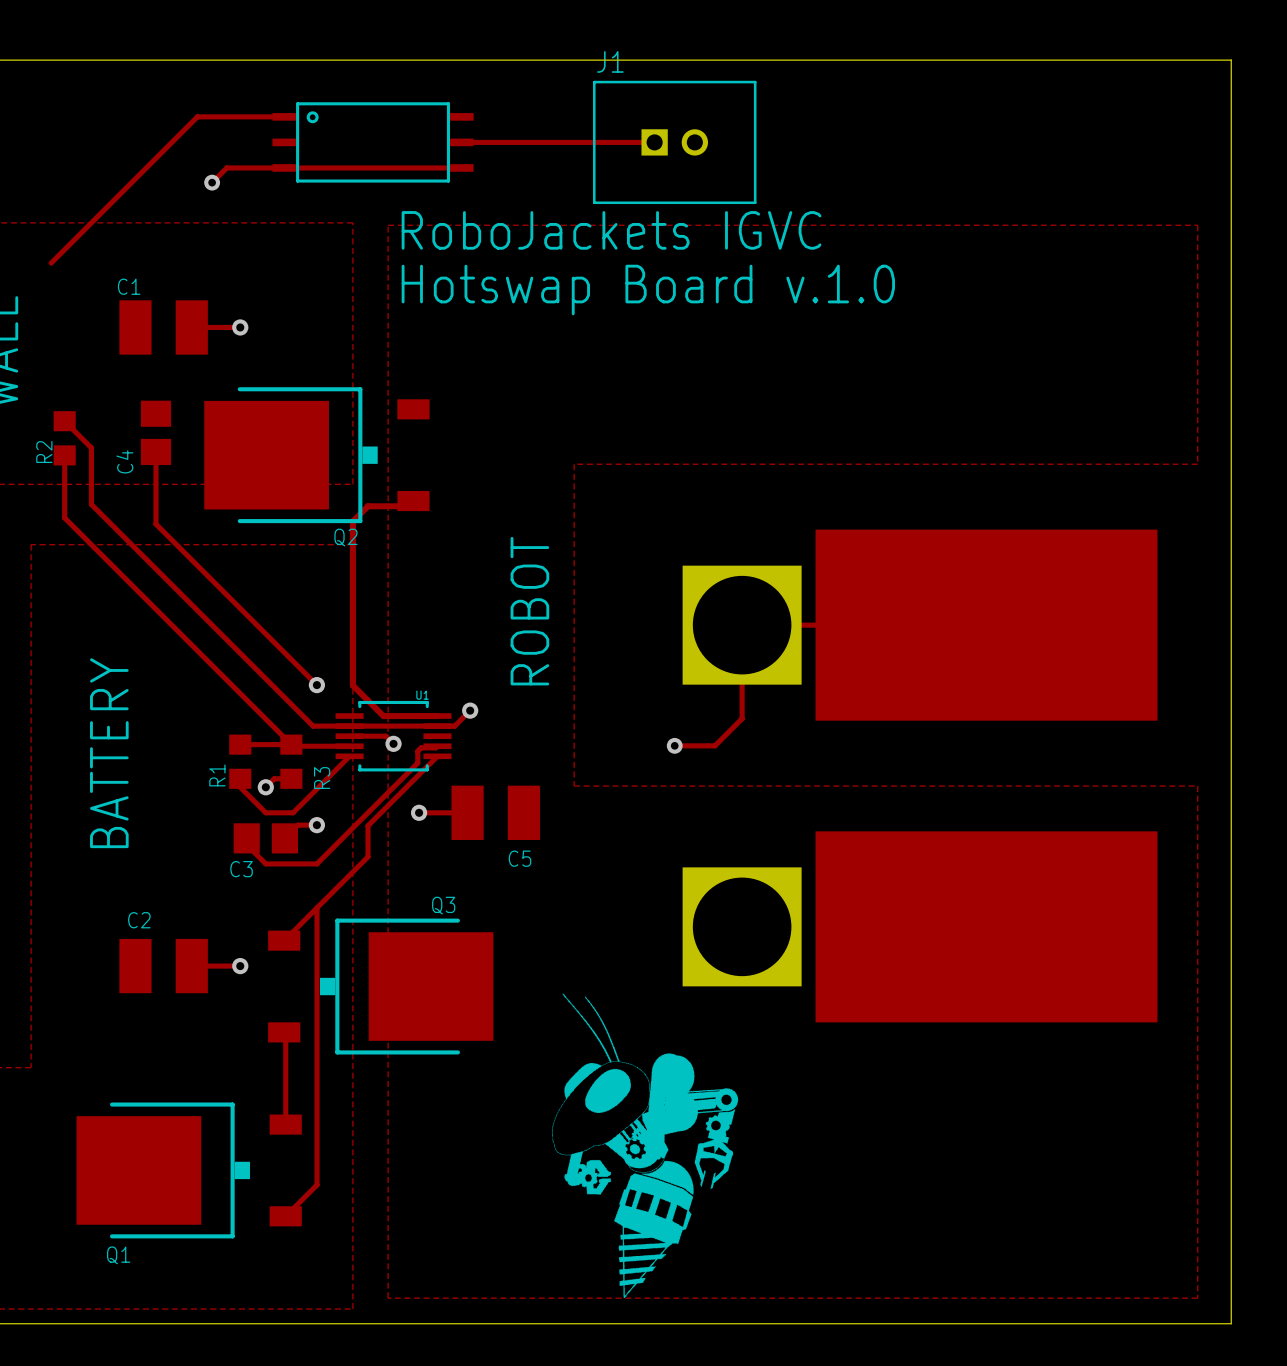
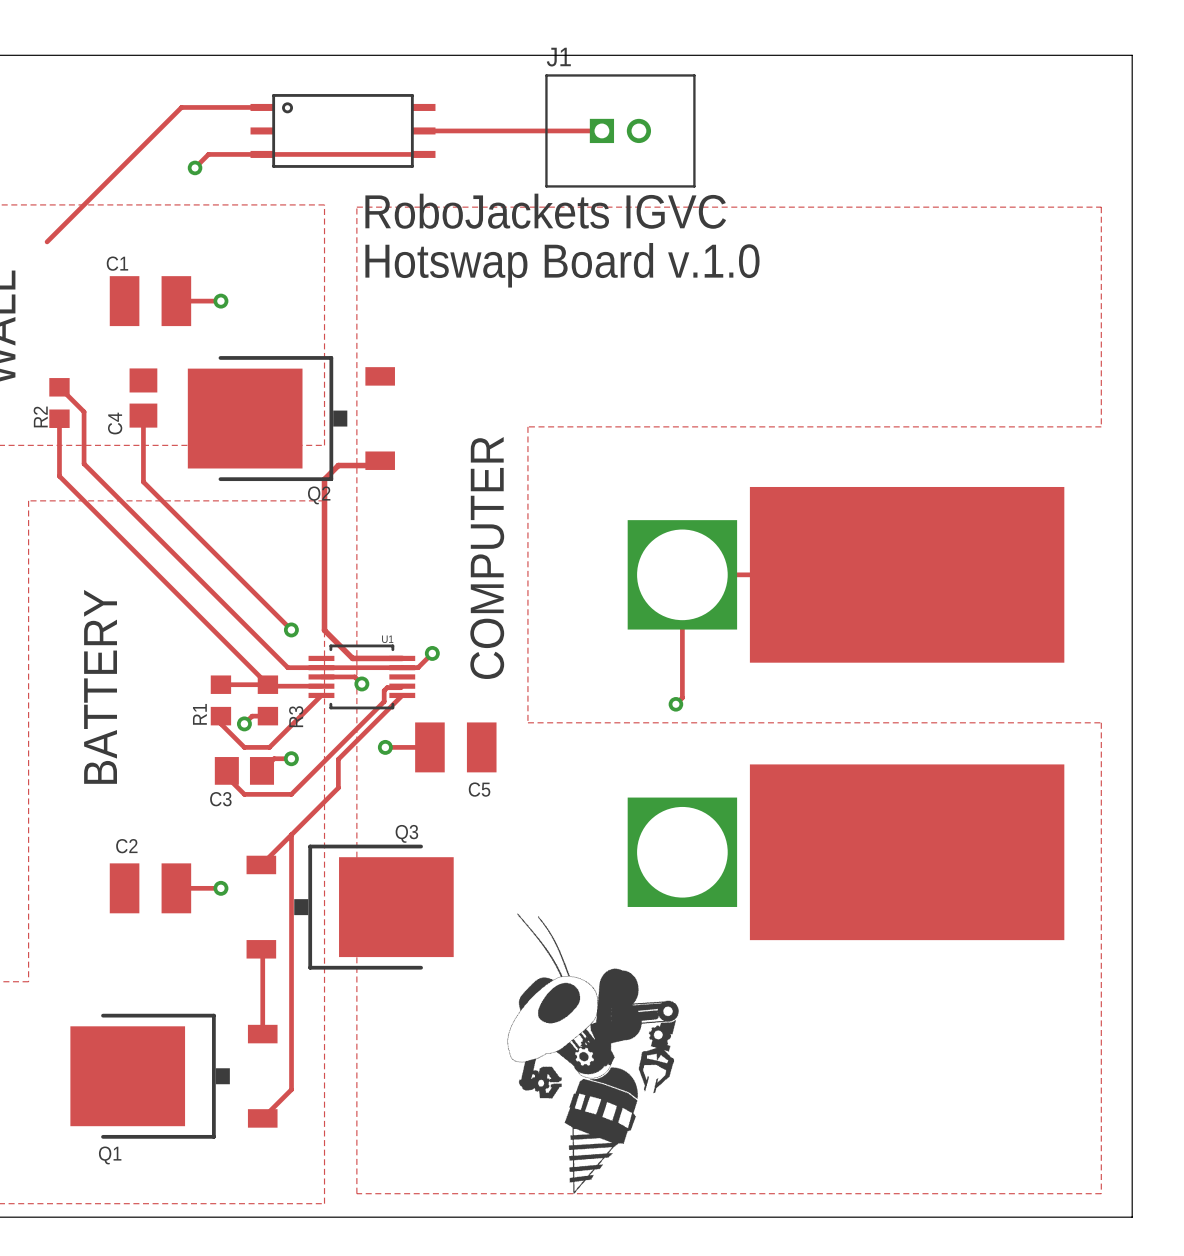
text: none -> COMPUTER (487, 558)
text: ROBOT (529, 611) -> none
track: (742, 718) (714, 745) (674, 745) -> (682, 660) (682, 697) (675, 704)
via position: (674, 745) -> (675, 704)

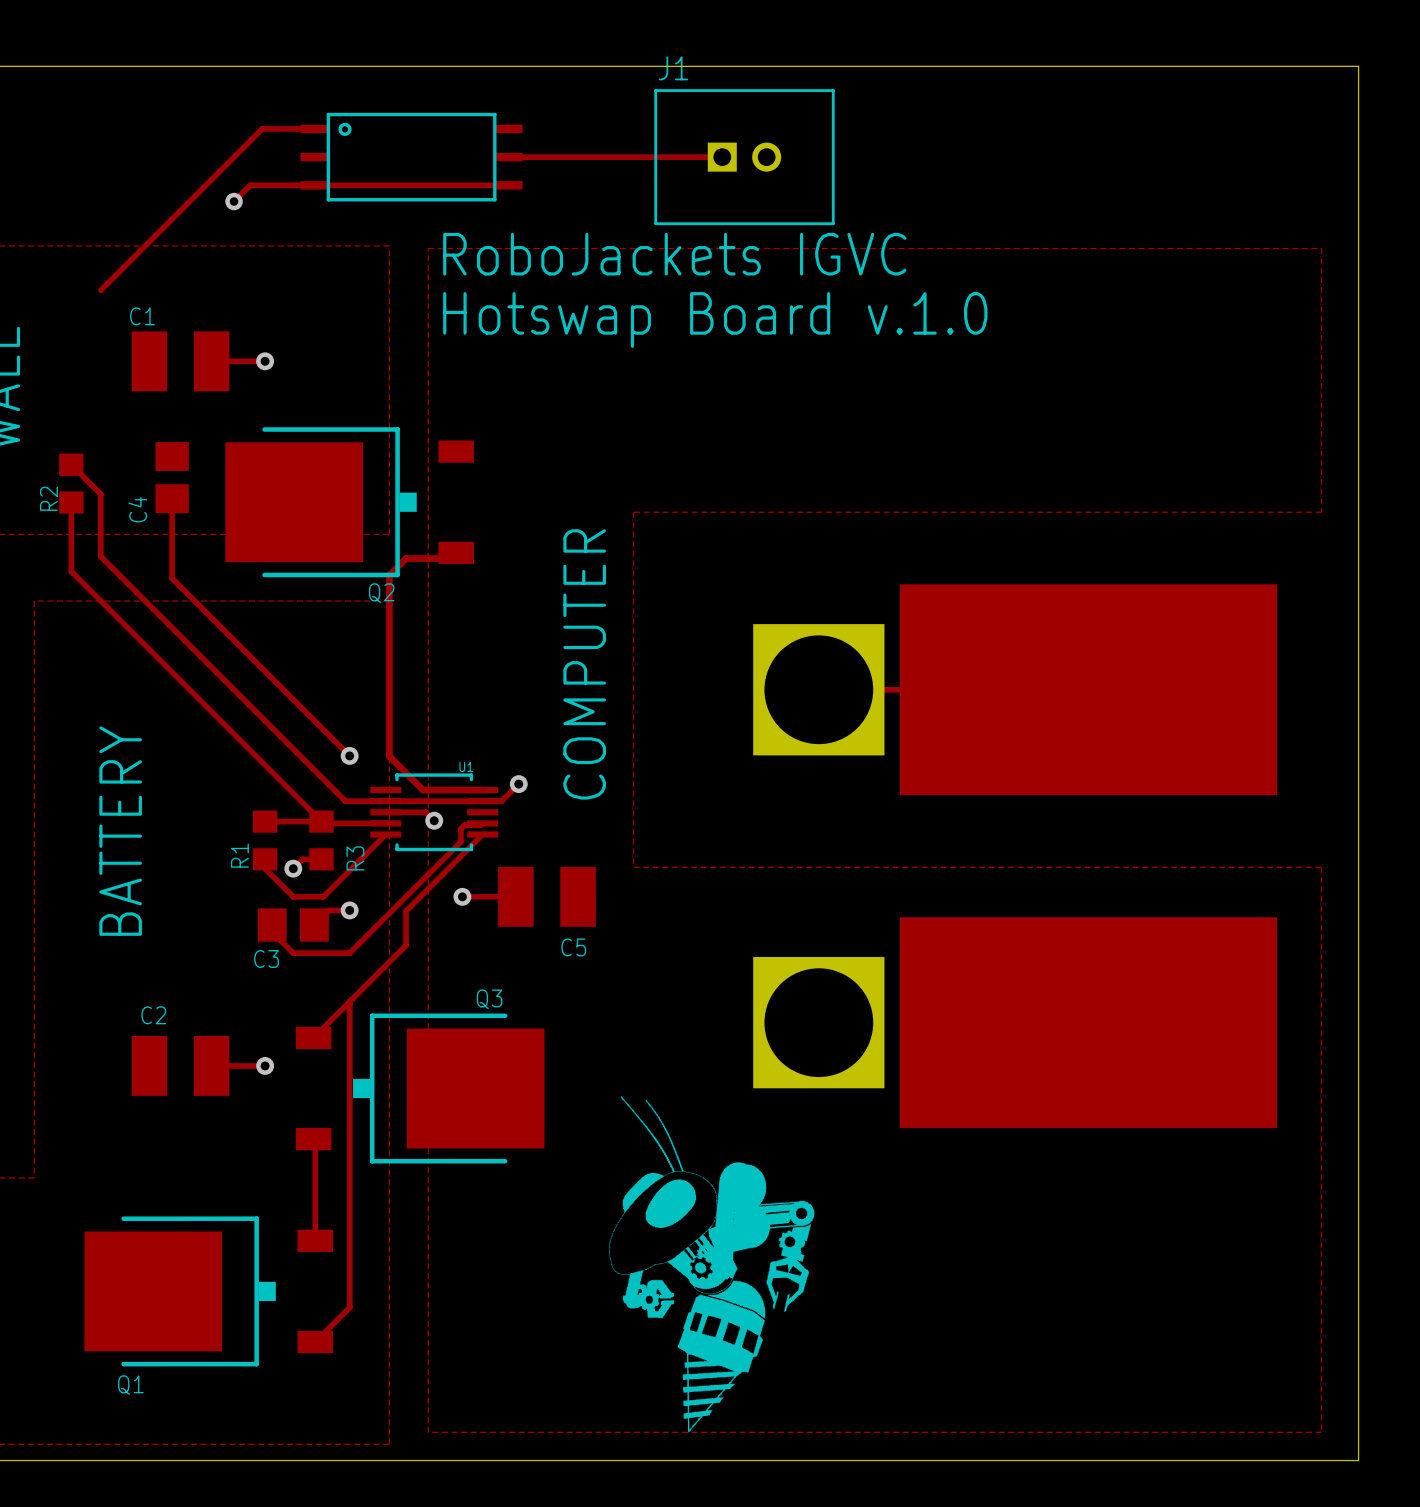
track: (218, 107) (181, 107) (47, 241) -> (262, 128) (100, 290)
track: (682, 574) (682, 697) (675, 704) -> none
via: (675, 704) -> none

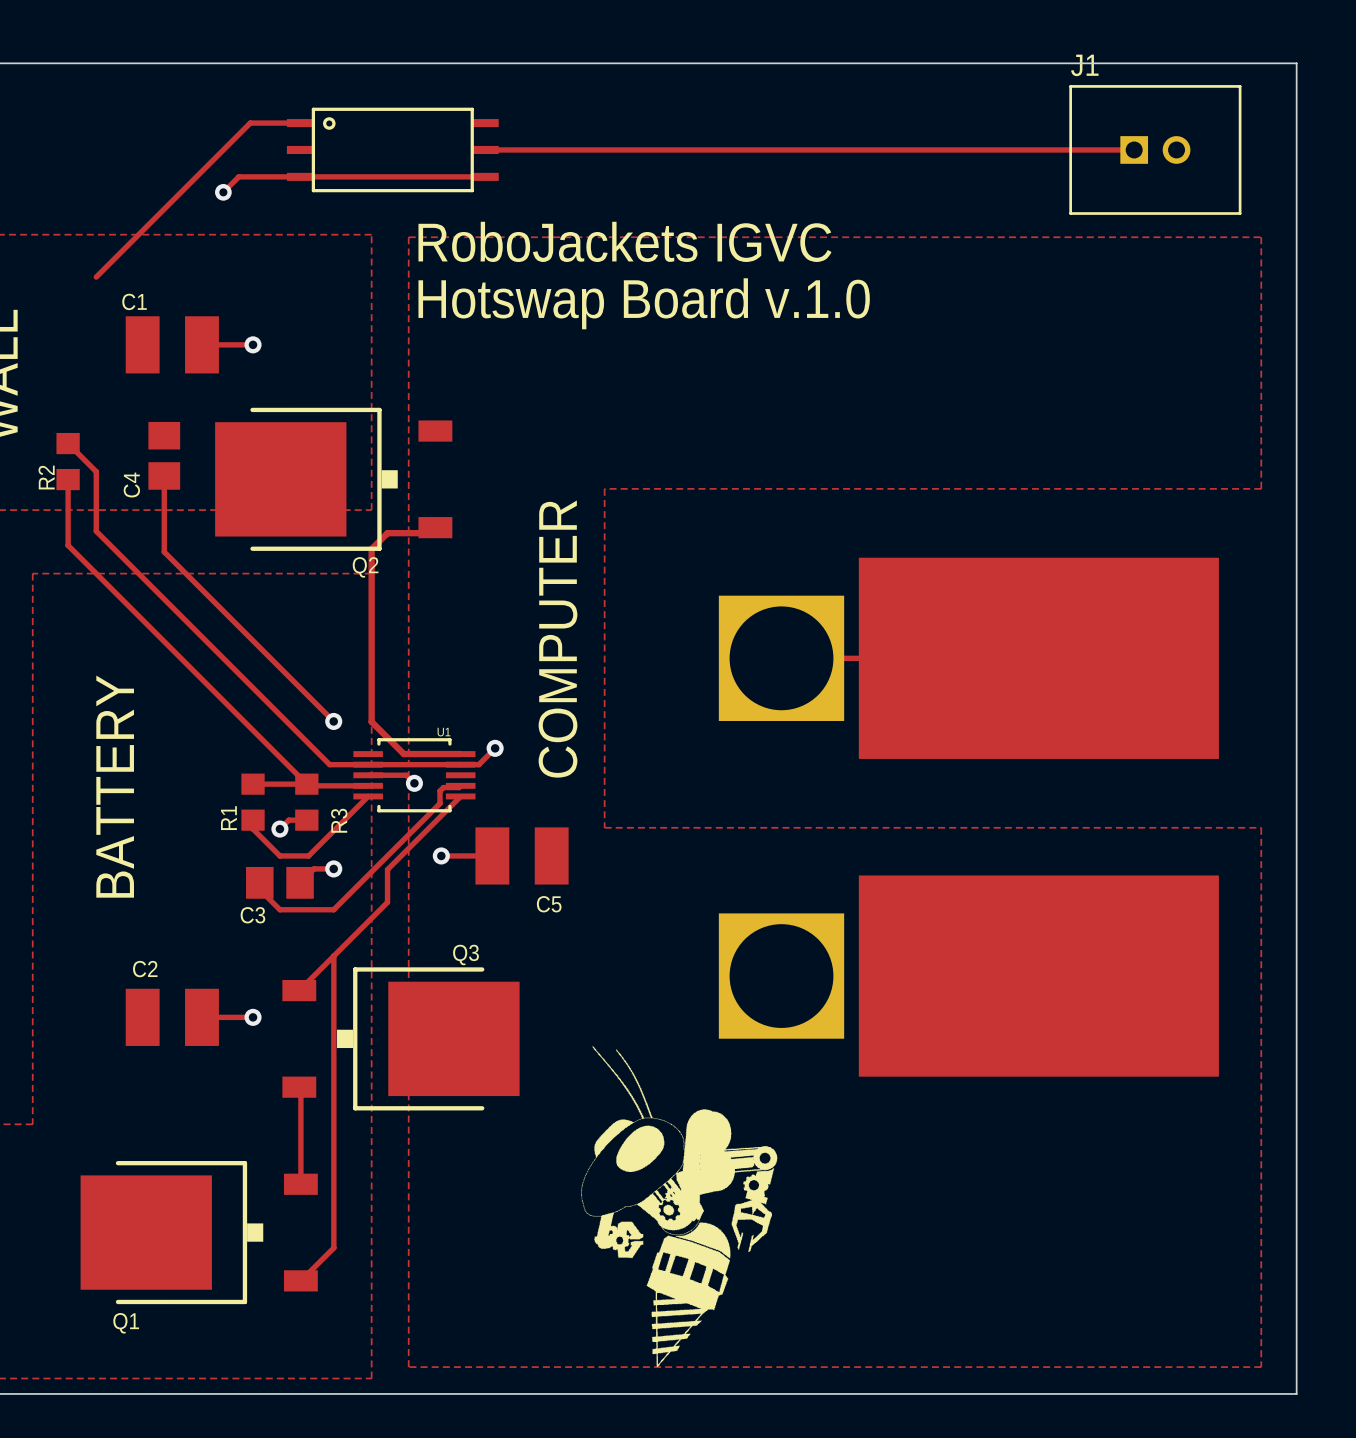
track: none -> (689, 149) (1134, 149)
J1 position: (744, 157) -> (1155, 149)

